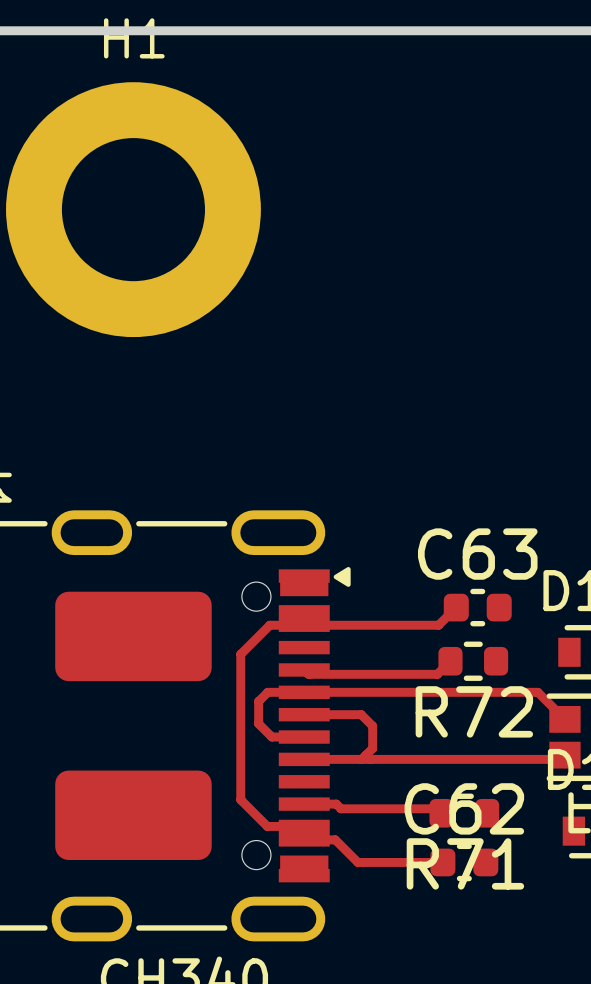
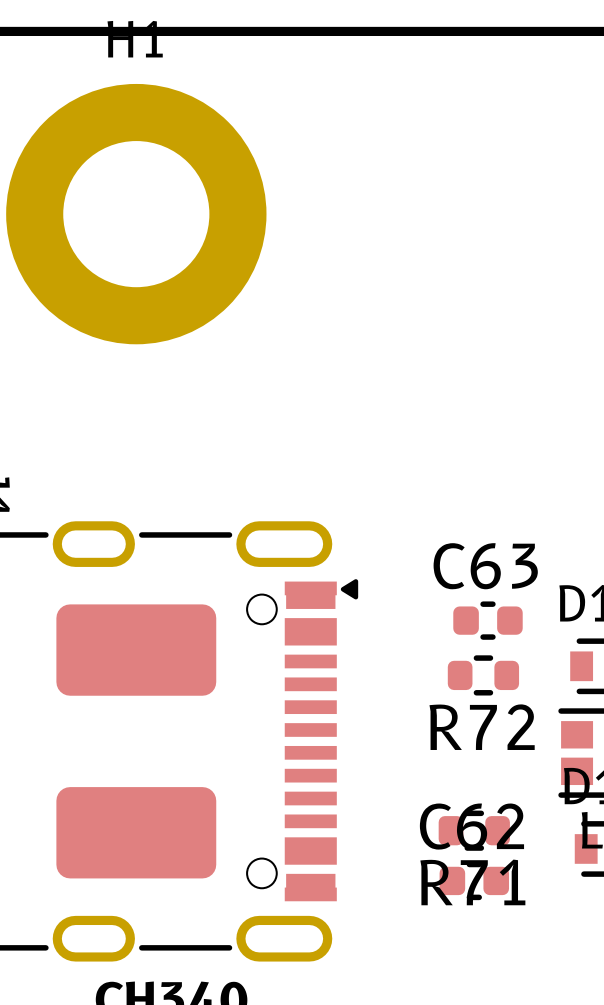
track: (456, 607) (438, 625) (269, 625) (240, 654) (240, 799) (267, 826) (304, 826) -> none
track: (450, 661) (437, 674) (308, 674) (304, 669) -> none
track: (304, 714) (361, 714) (372, 726) (372, 748) (361, 759) -> none
track: (564, 719) (537, 692) (267, 692) (258, 701) (258, 723) (271, 737) (304, 737) -> none
track: (564, 755) (560, 759) (304, 759) -> none
track: (304, 804) (336, 804) (341, 808) (437, 808) (441, 813) -> none
track: (304, 839) (335, 839) (357, 862) (442, 862) -> none

